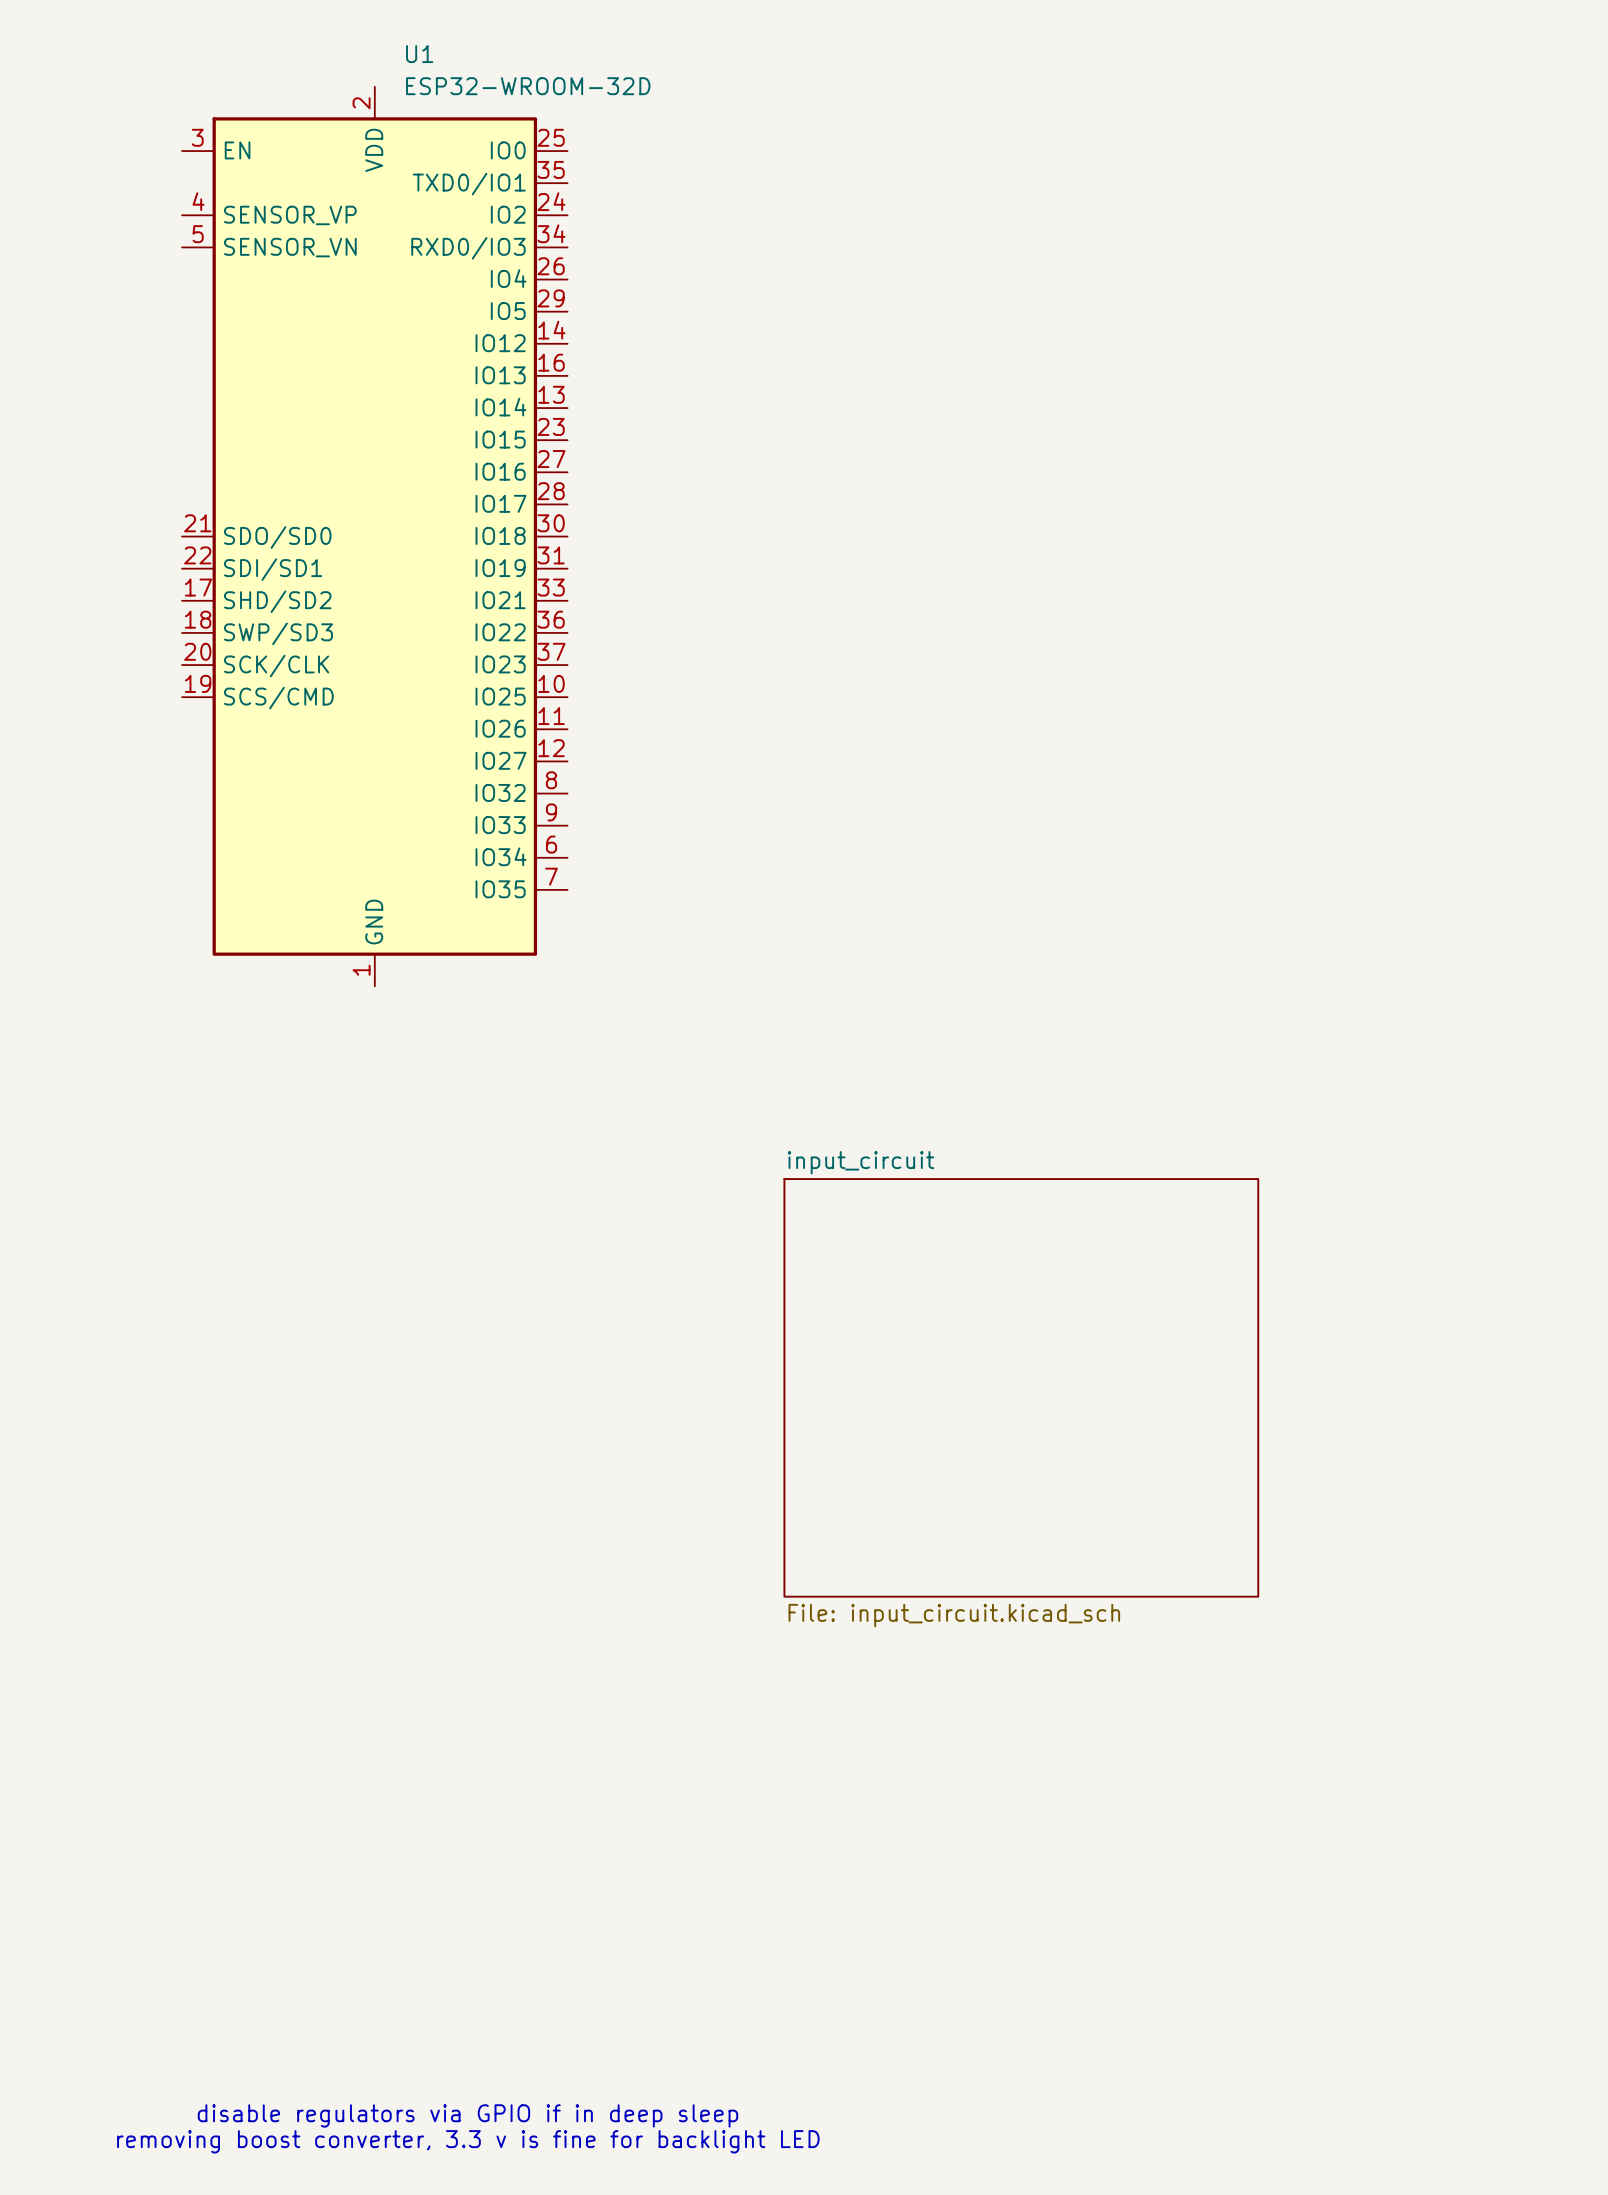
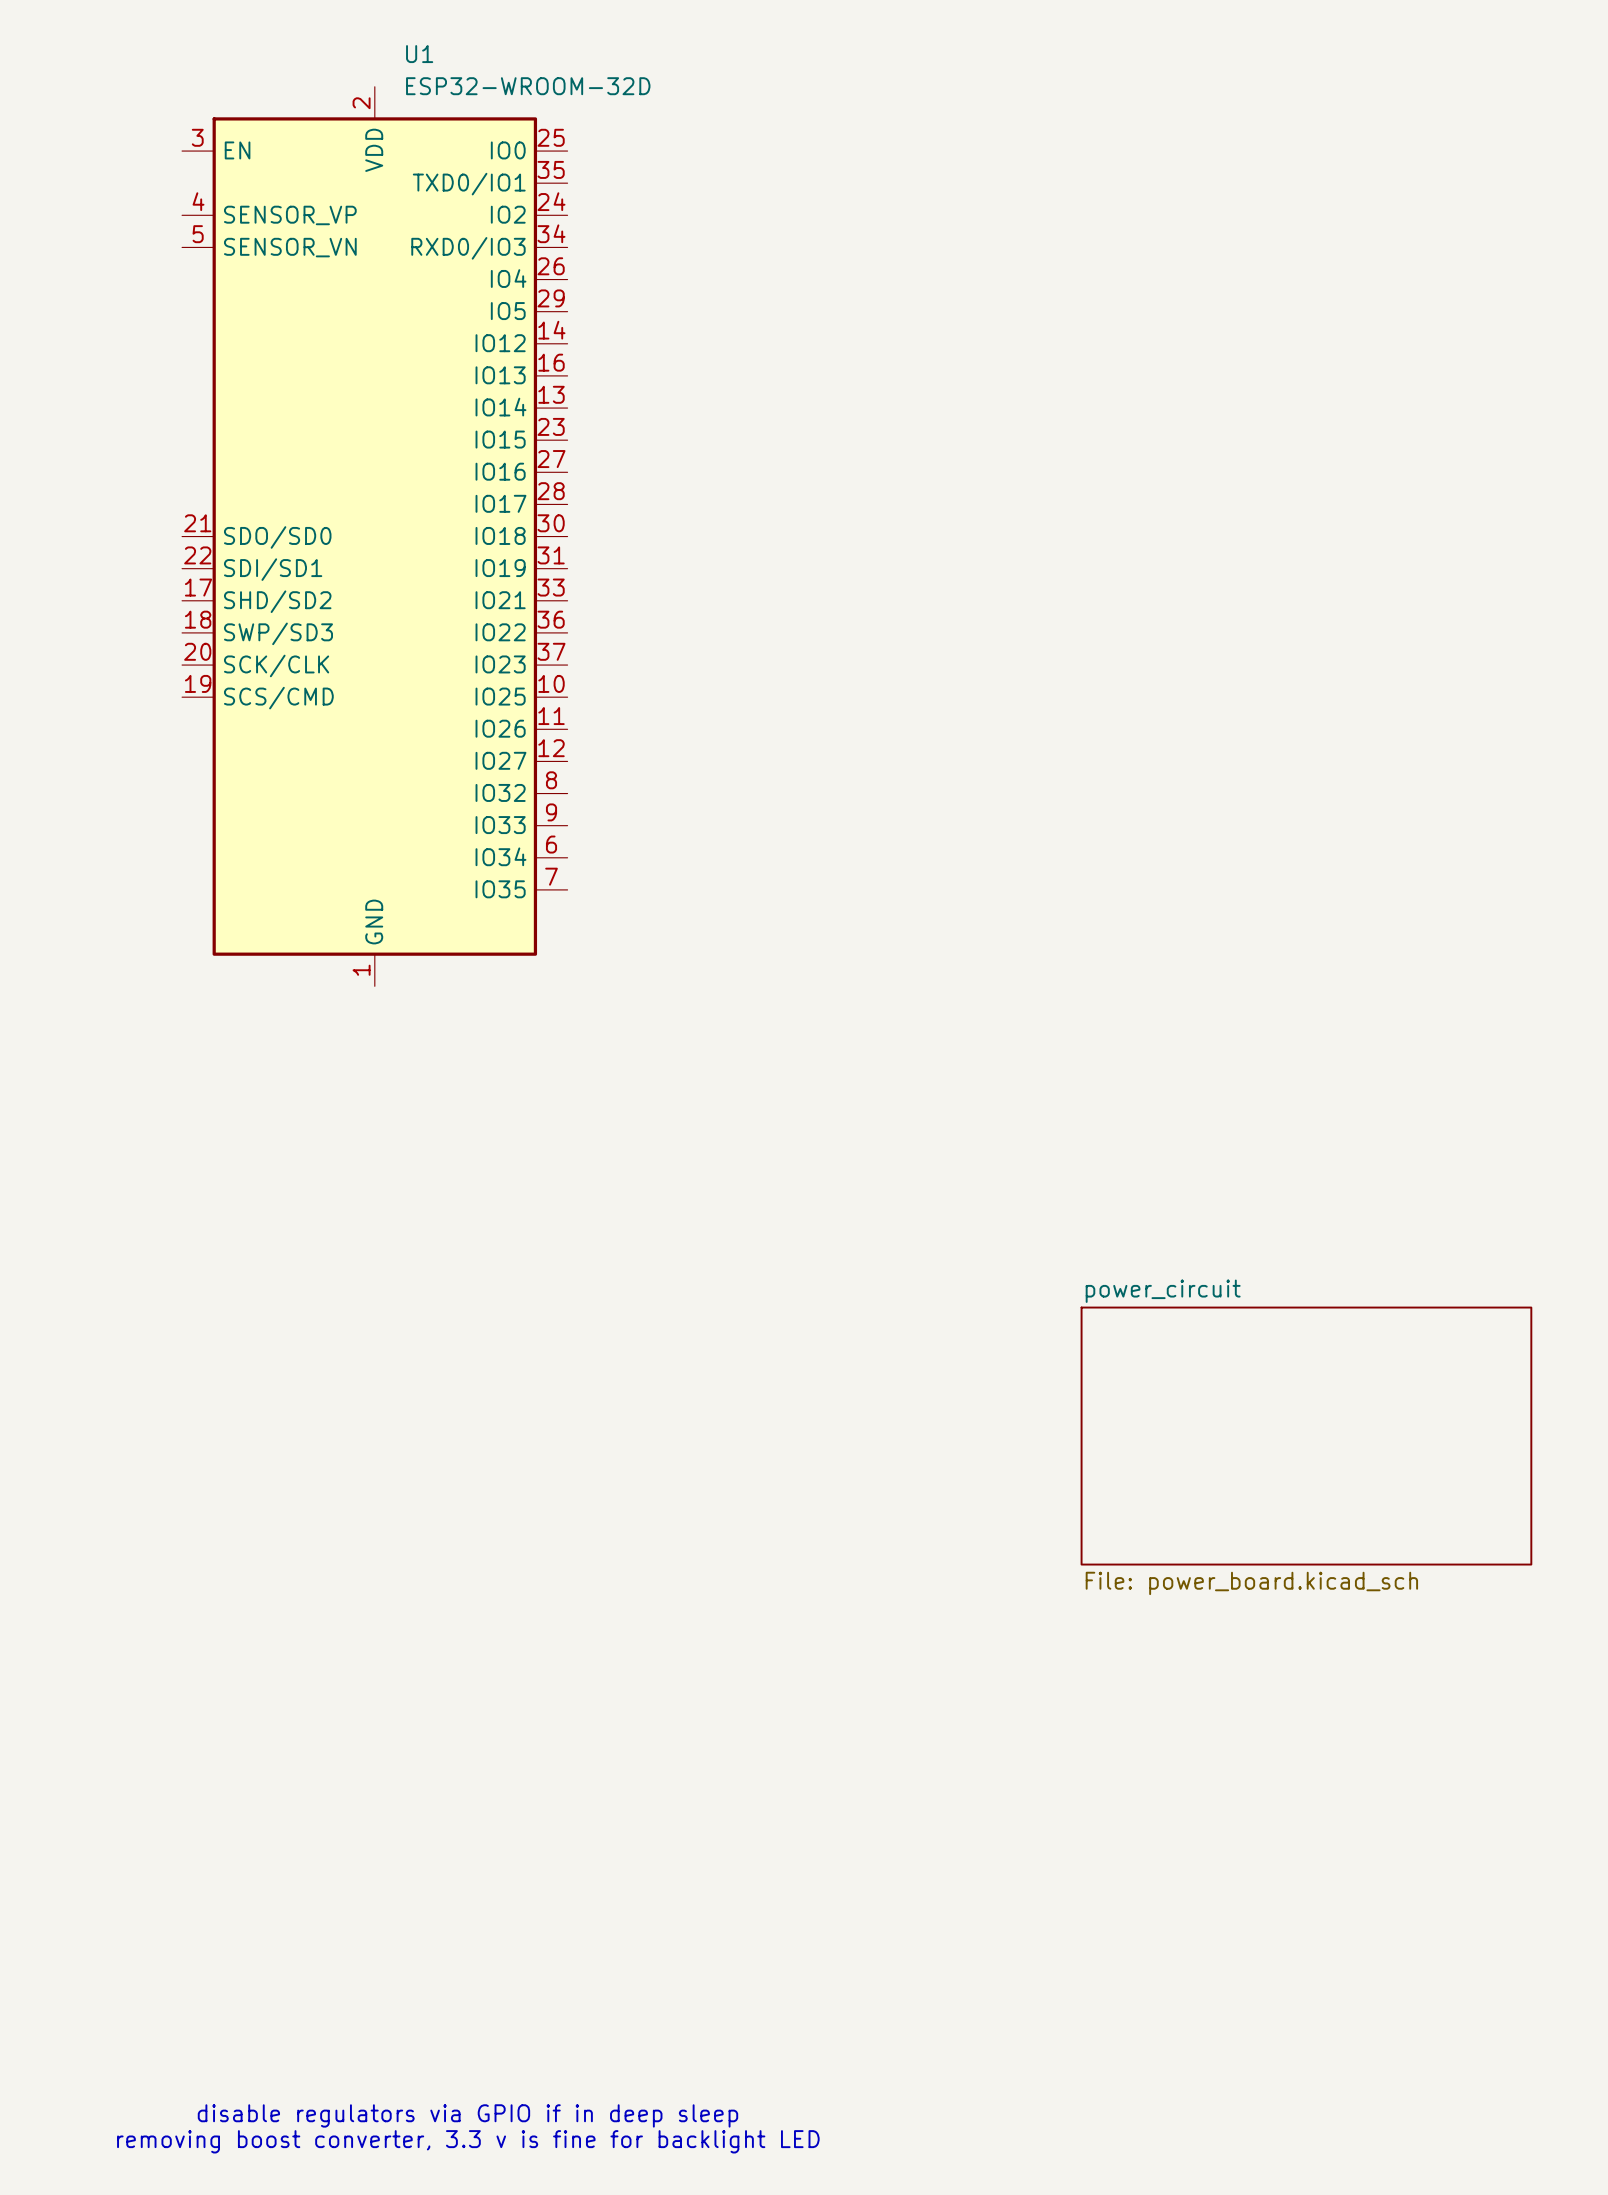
sheet input_circuit: File: input_circuit.kicad_sch (1021, 1387) -> none
sheet power_circuit: none -> File: power_board.kicad_sch (1306, 1436)

